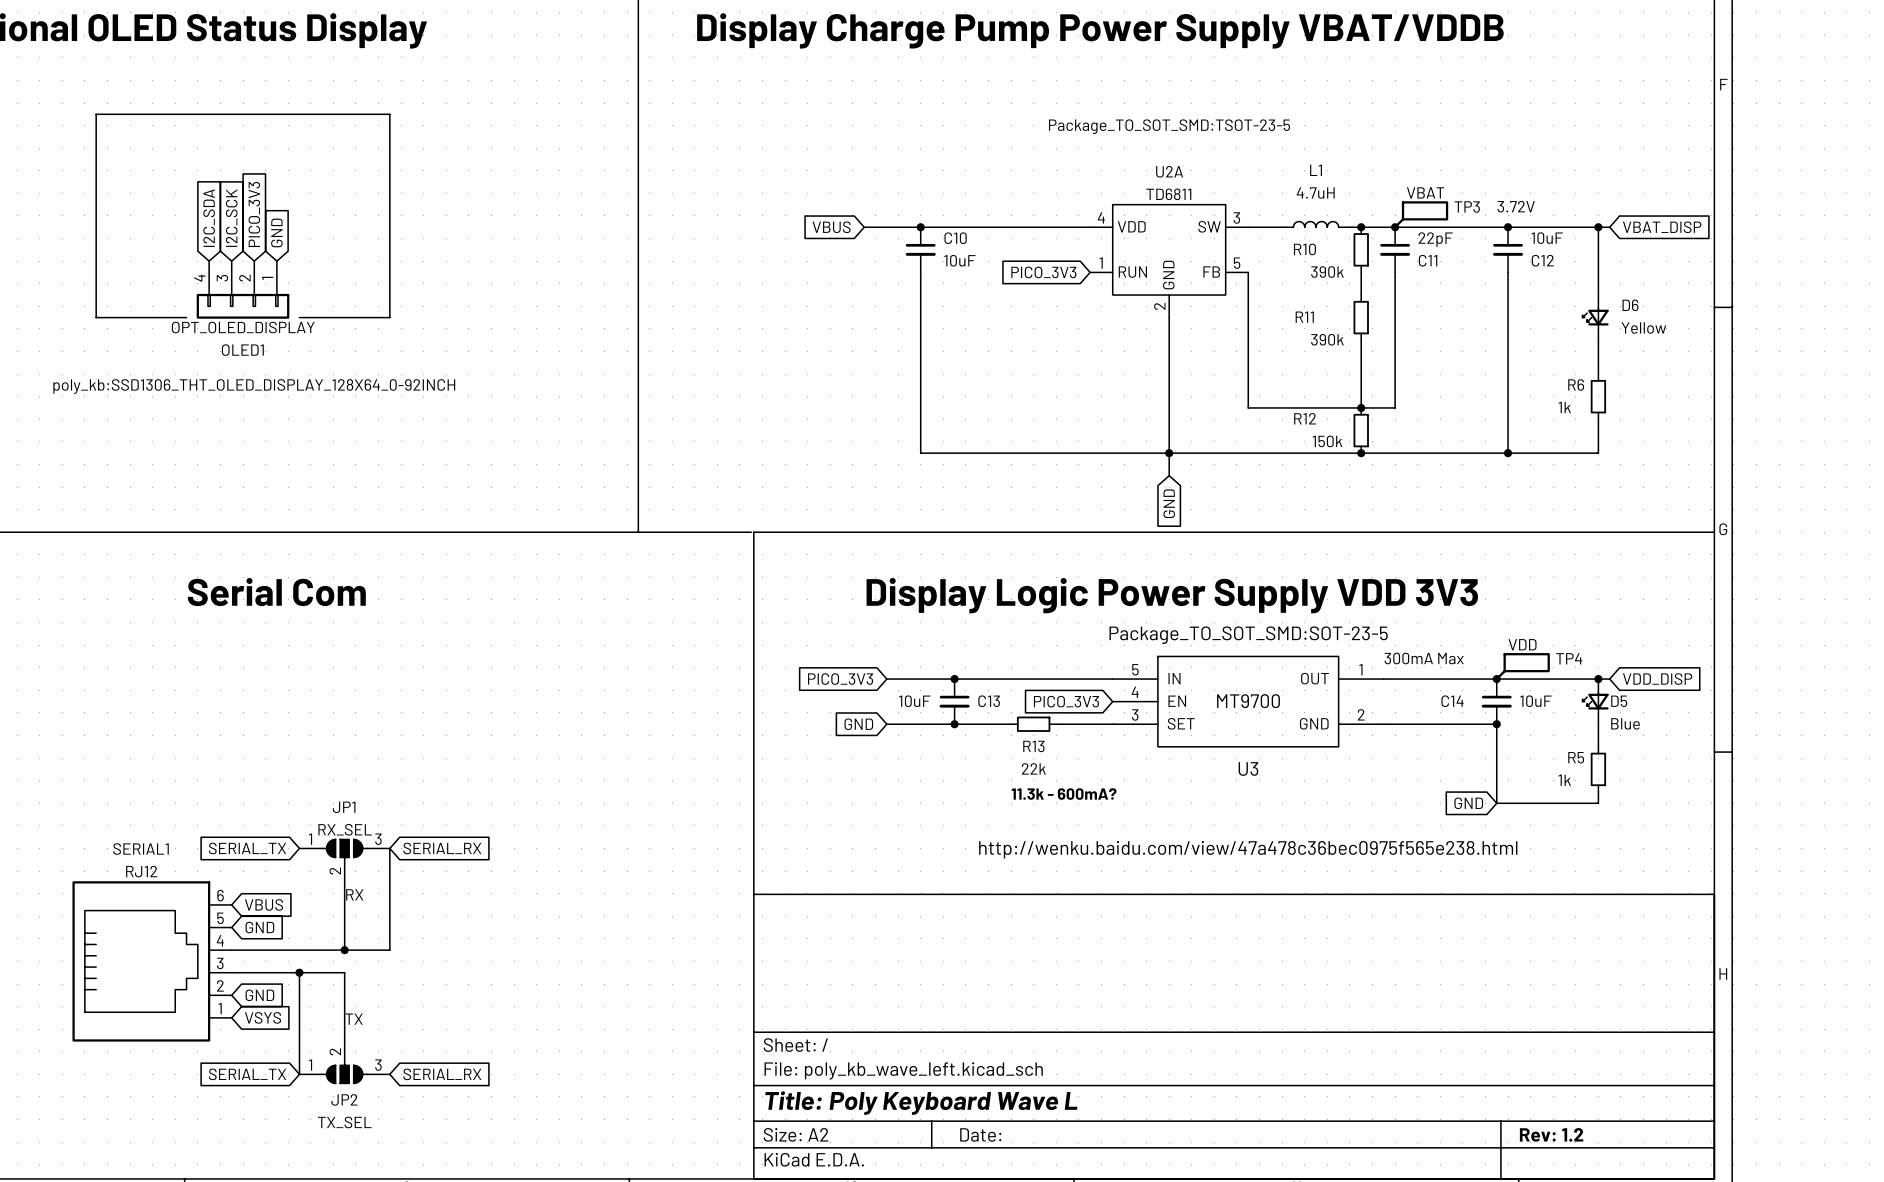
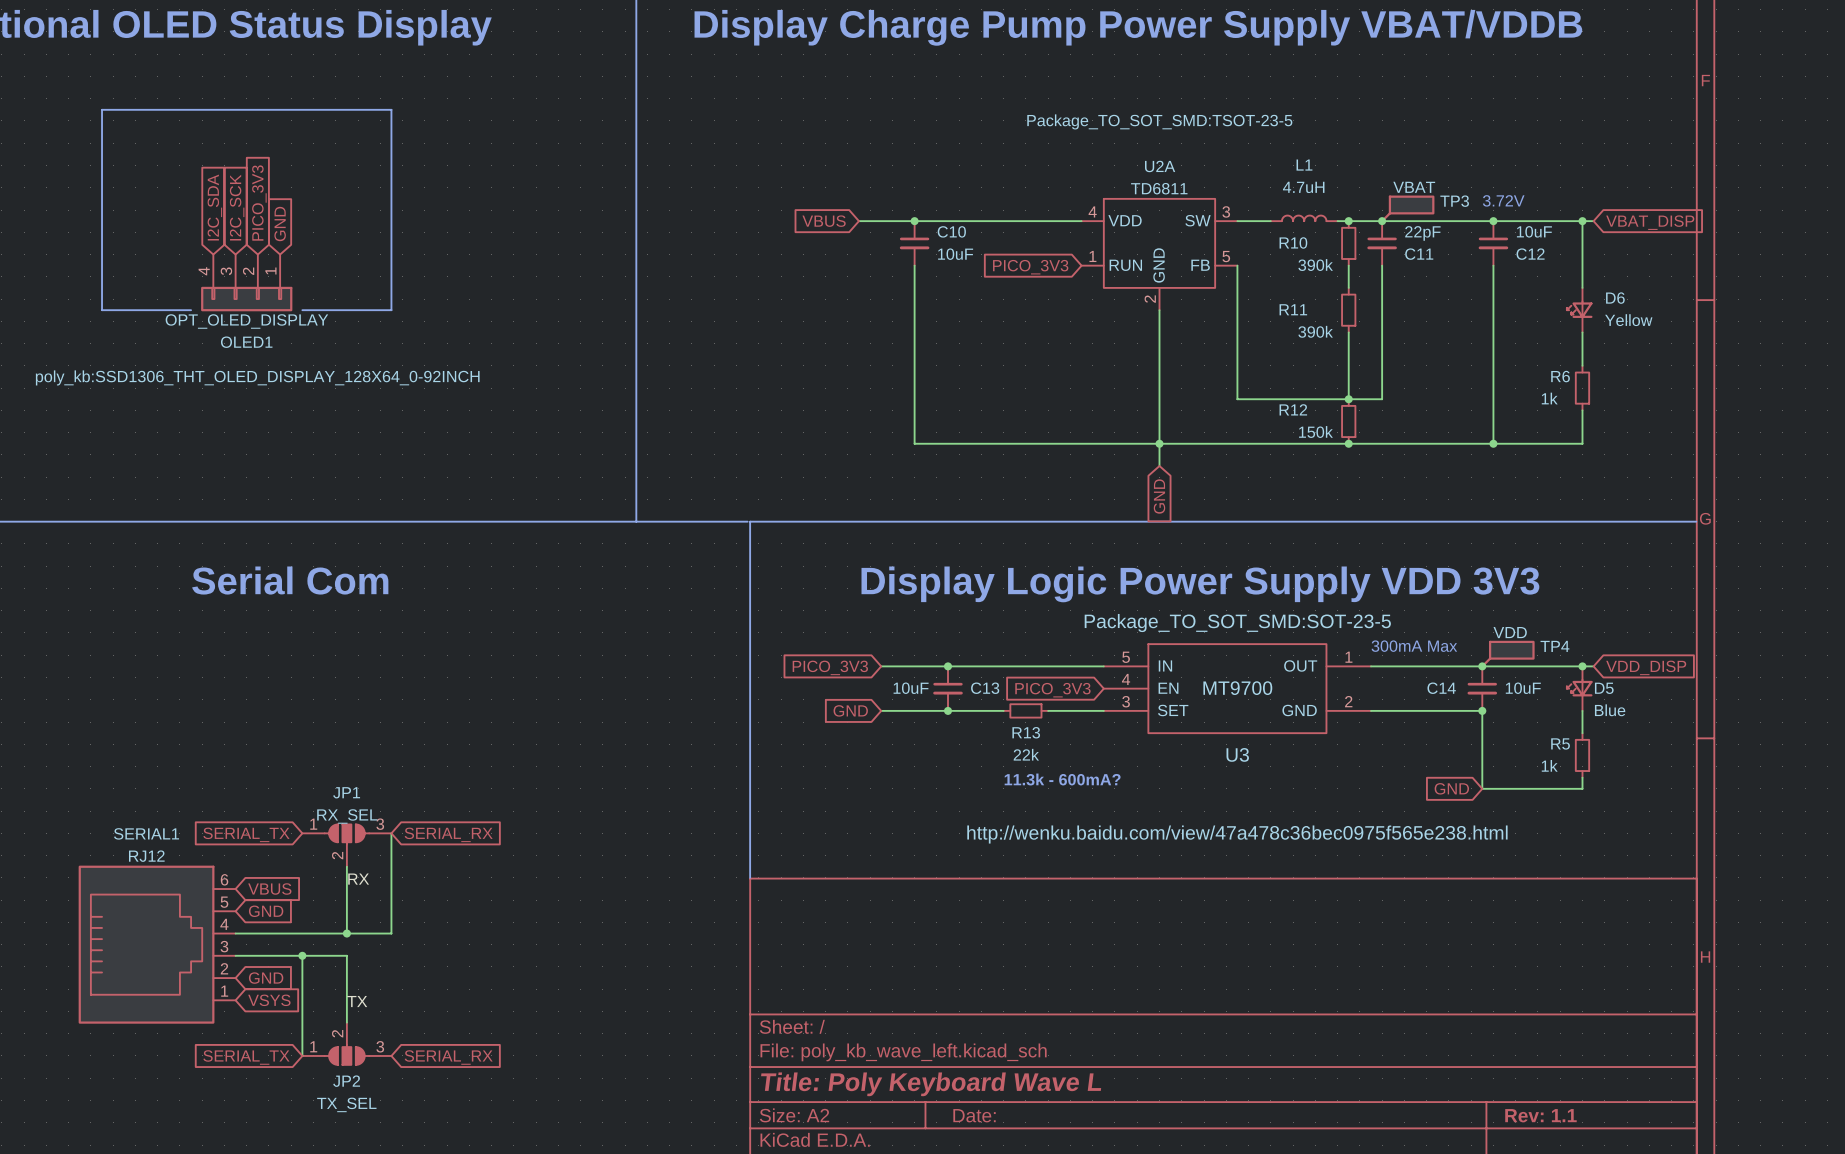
title block: Rev: 1.2 (1551, 1134) -> Rev: 1.1 (1540, 1115)

